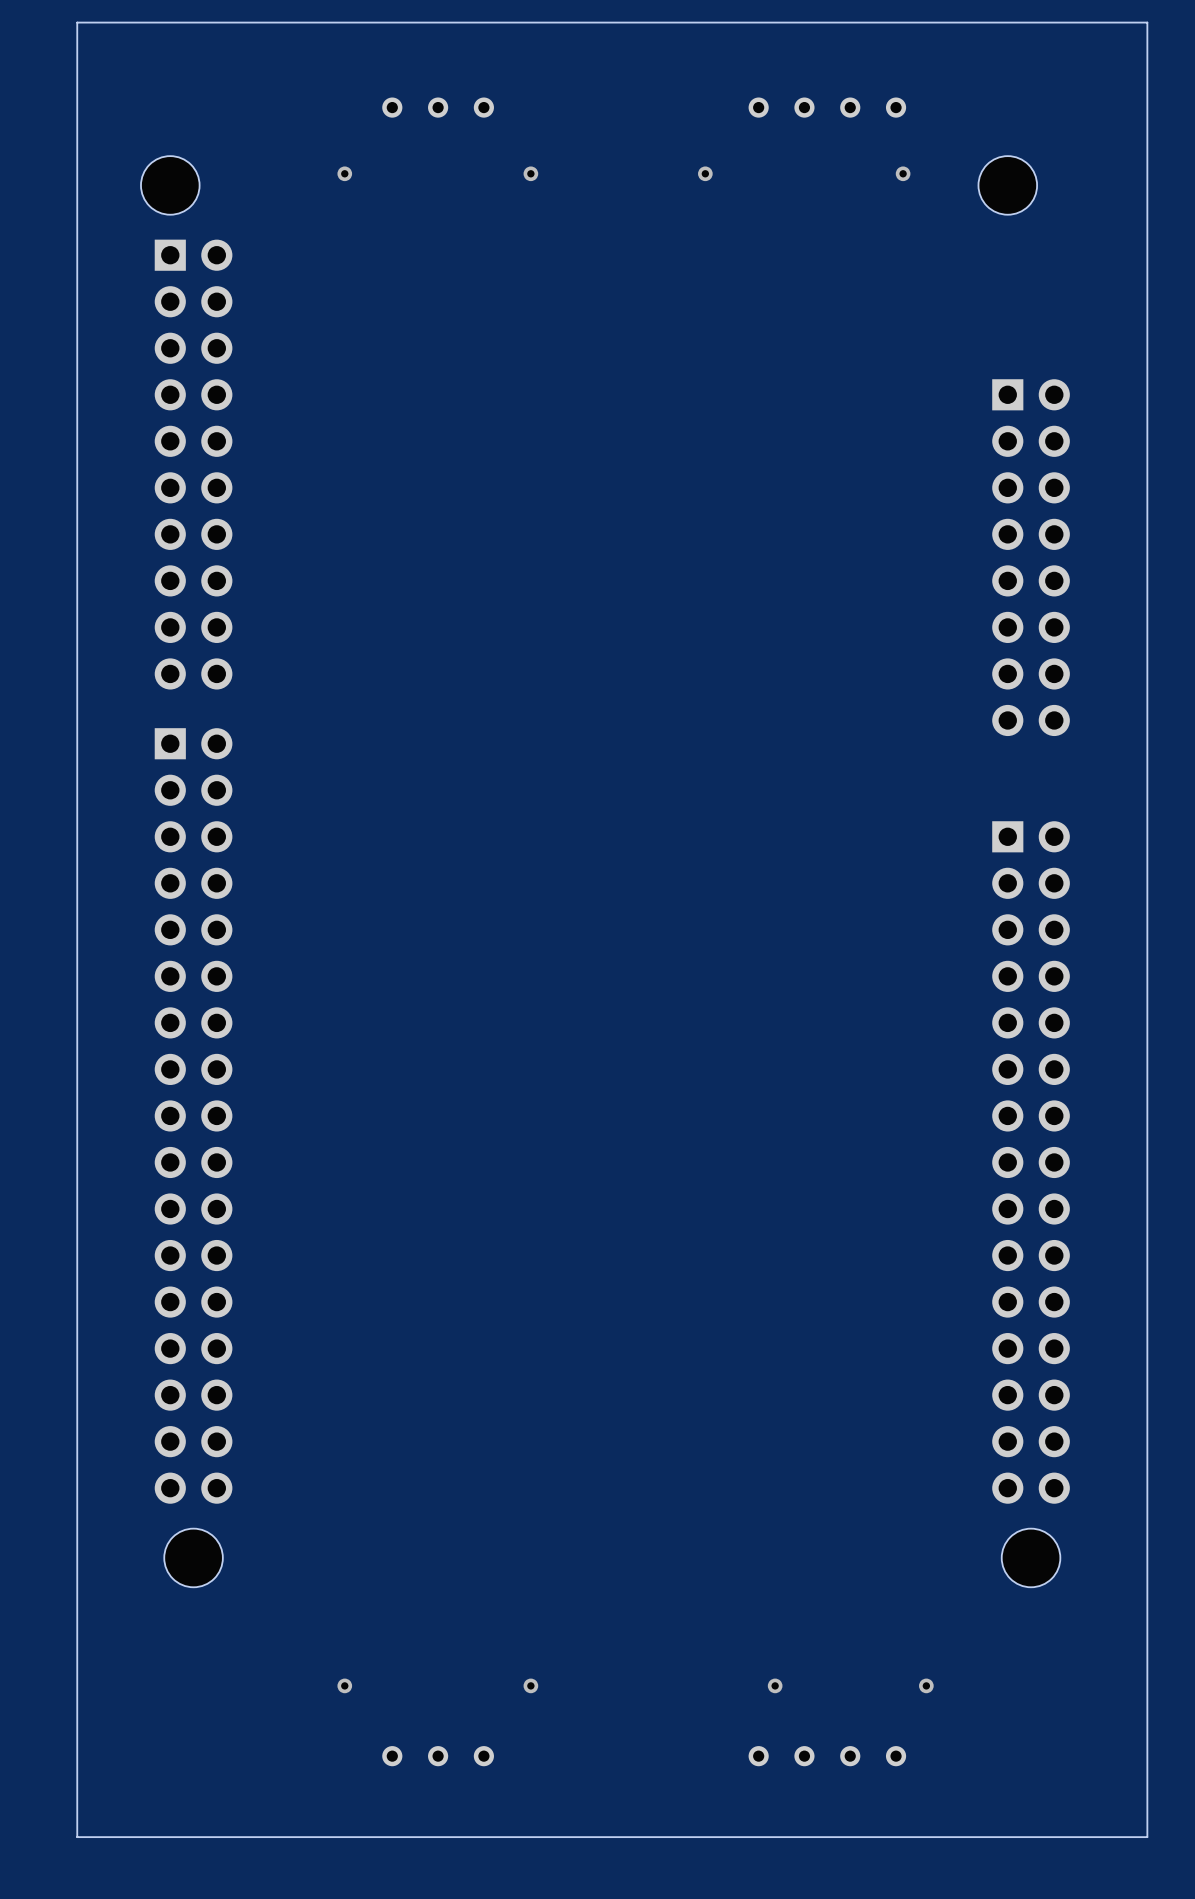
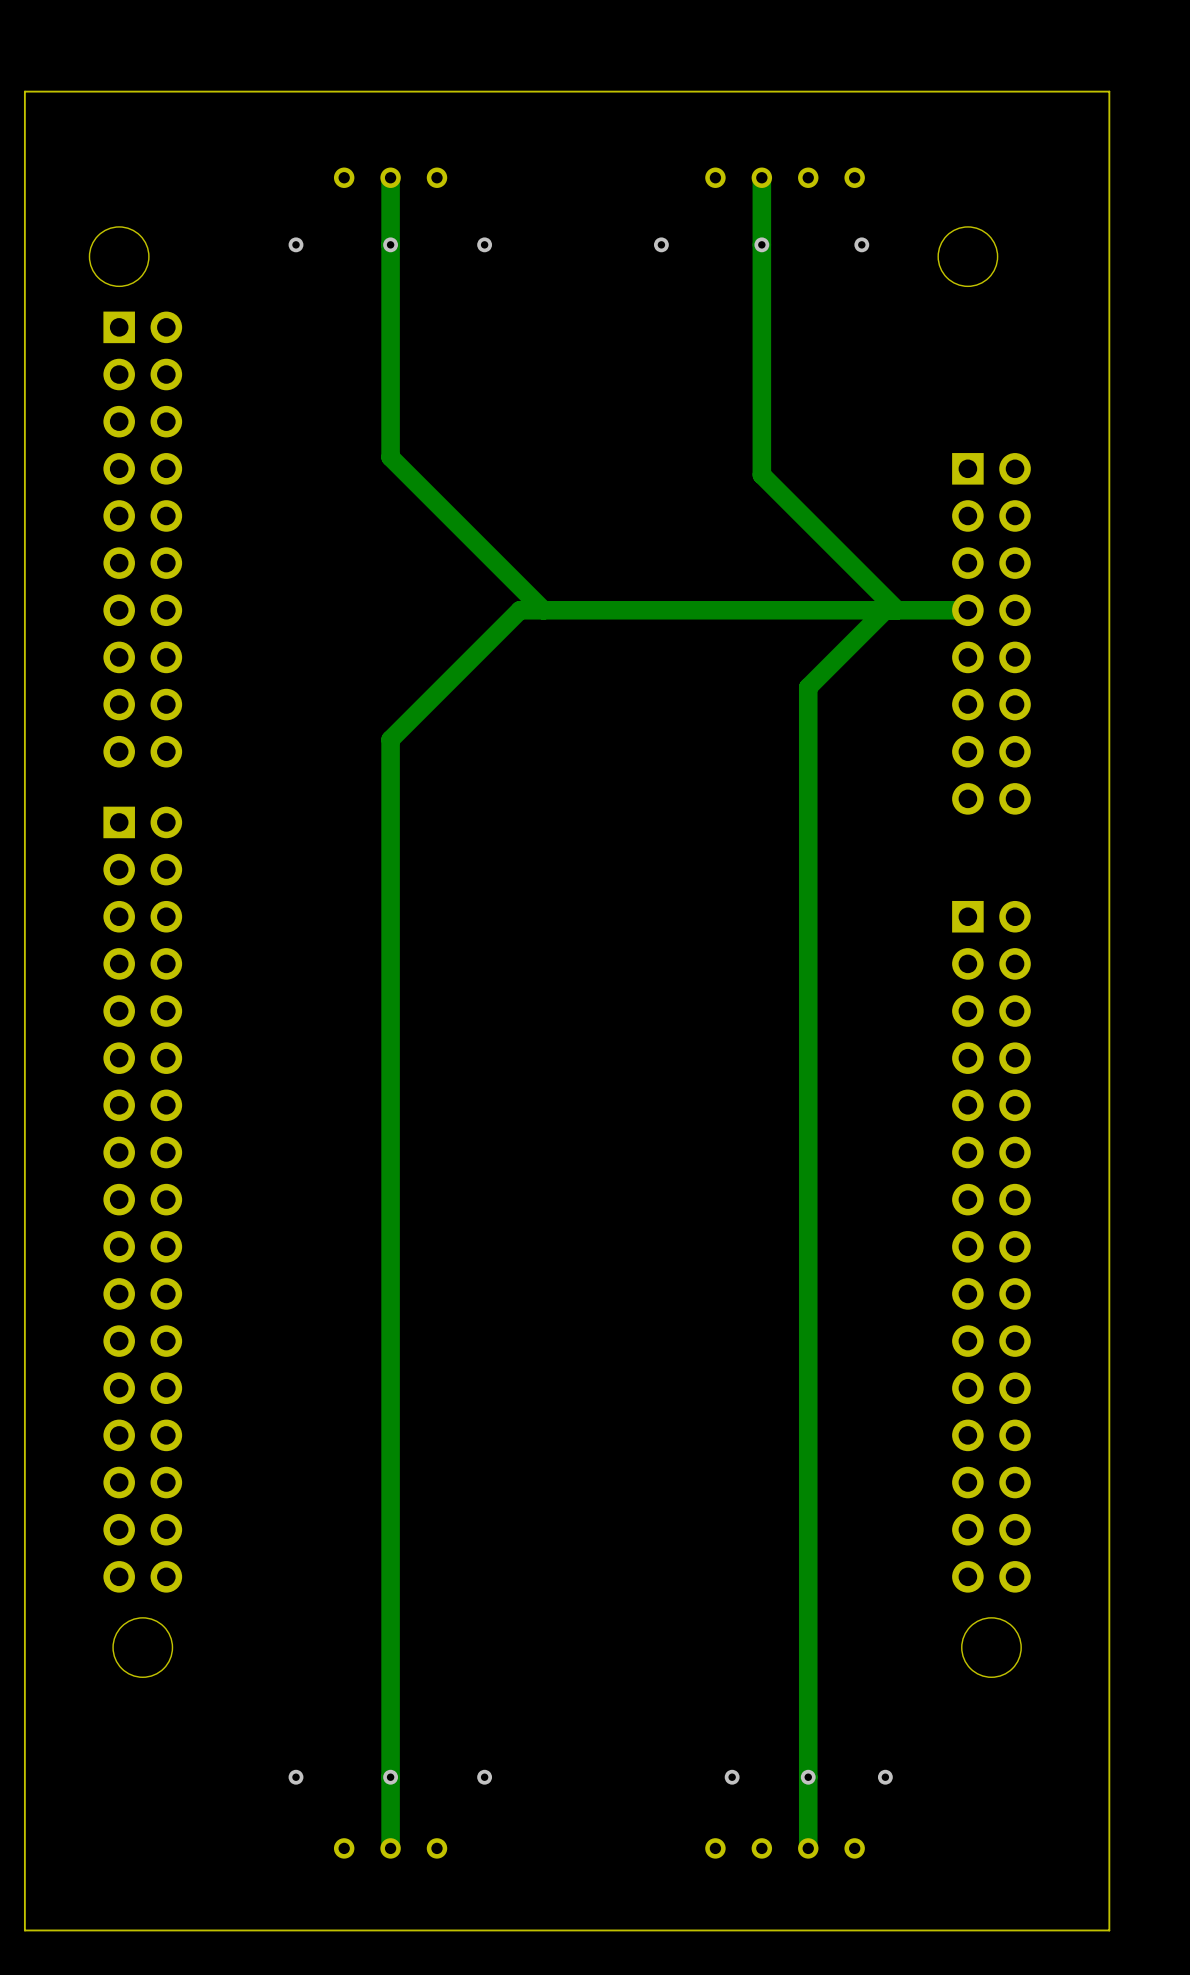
track: none -> (390, 177) (390, 457) (543, 610)
track: none -> (761, 177) (761, 474) (897, 610)
via: none -> (390, 244)
via: none -> (761, 244)
track: none -> (885, 610) (808, 687) (808, 1848)
track: none -> (967, 610) (519, 610) (390, 739) (390, 1848)
via: none -> (390, 1777)
via: none -> (808, 1777)

